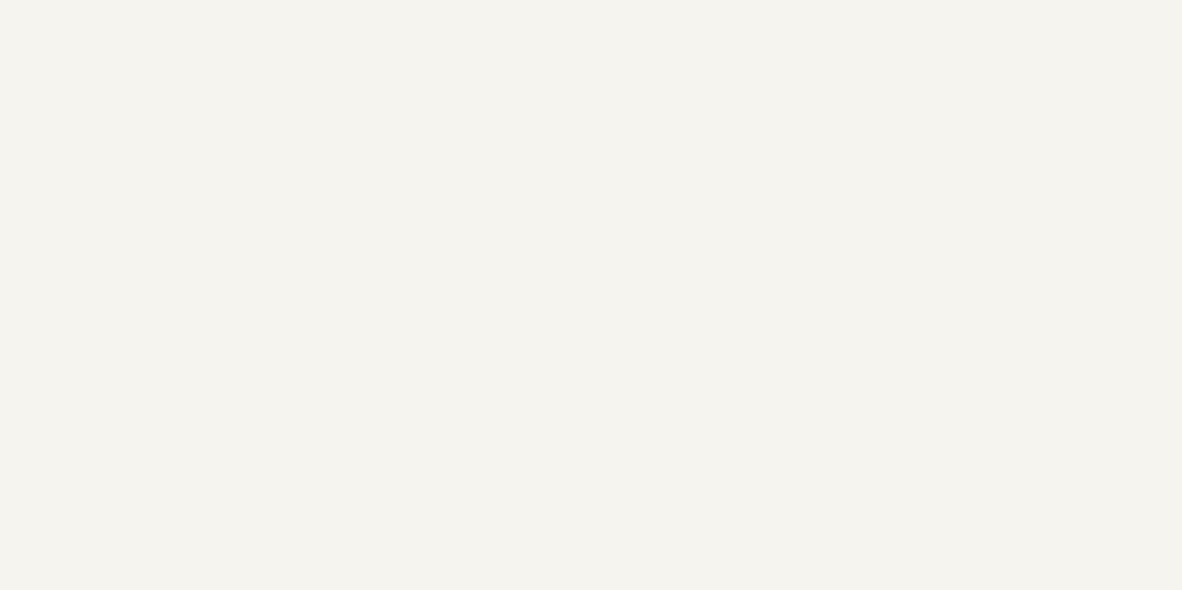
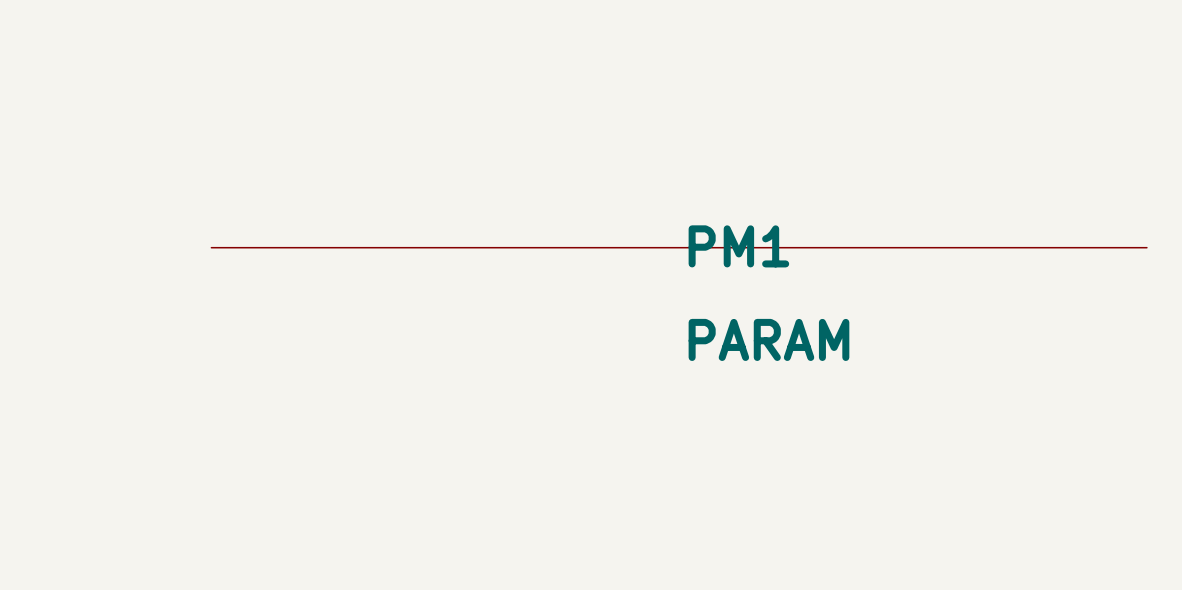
PM1: none -> PARAM (679, 247)

